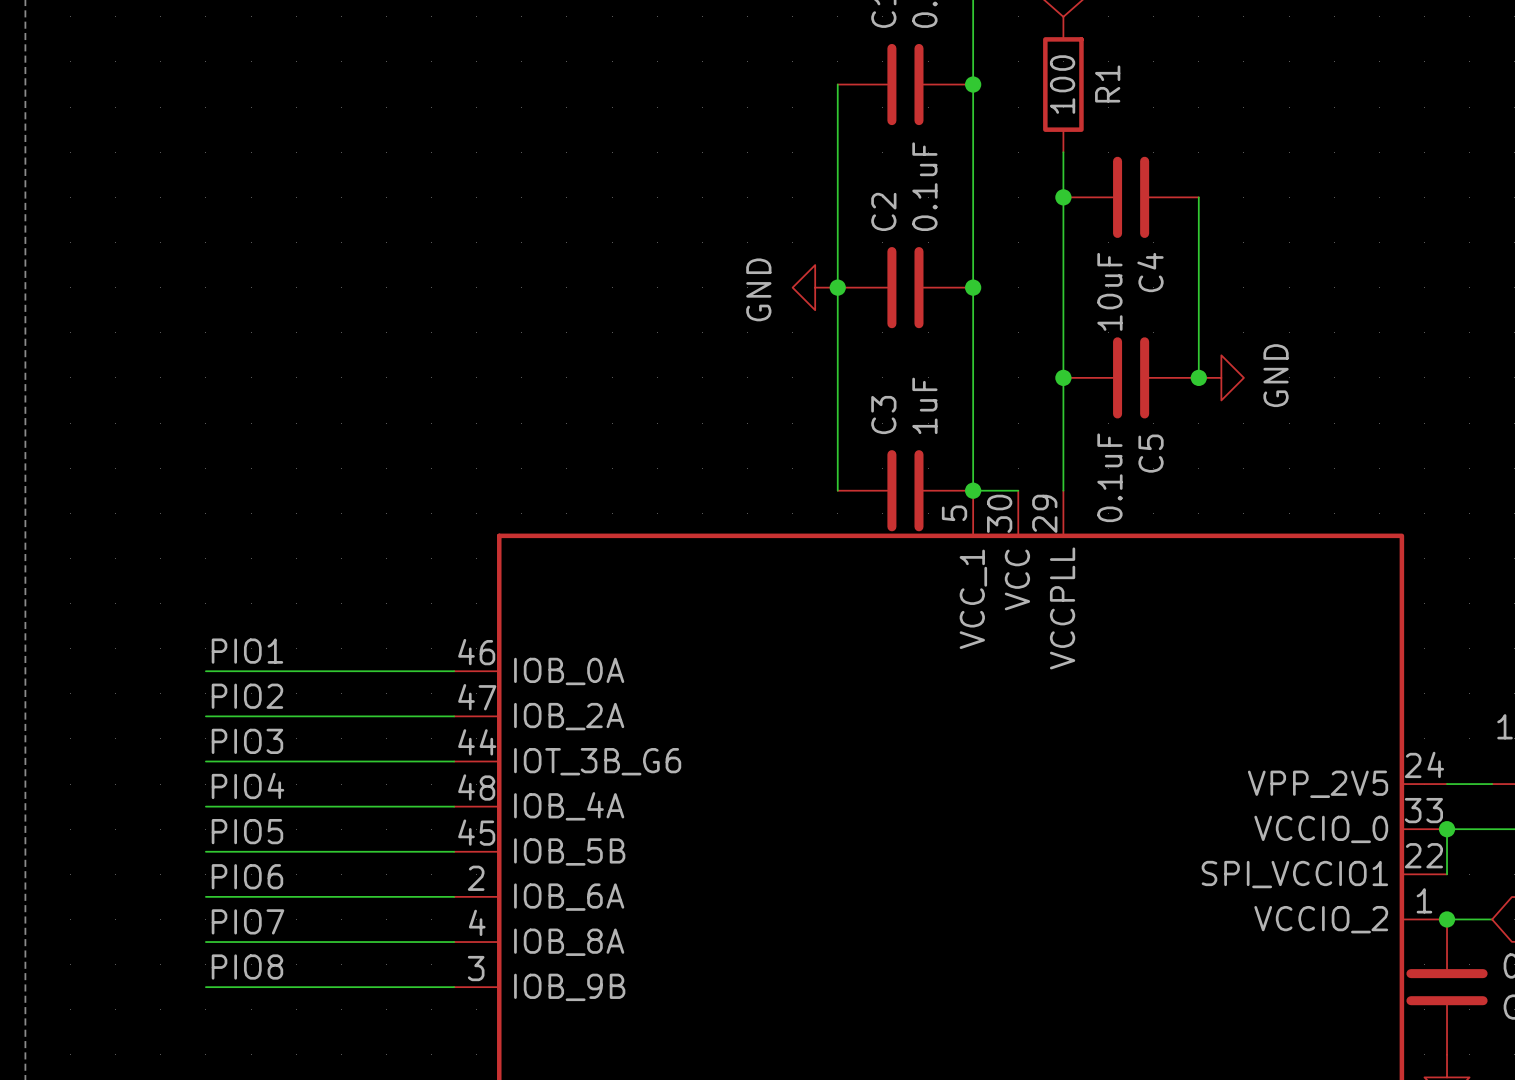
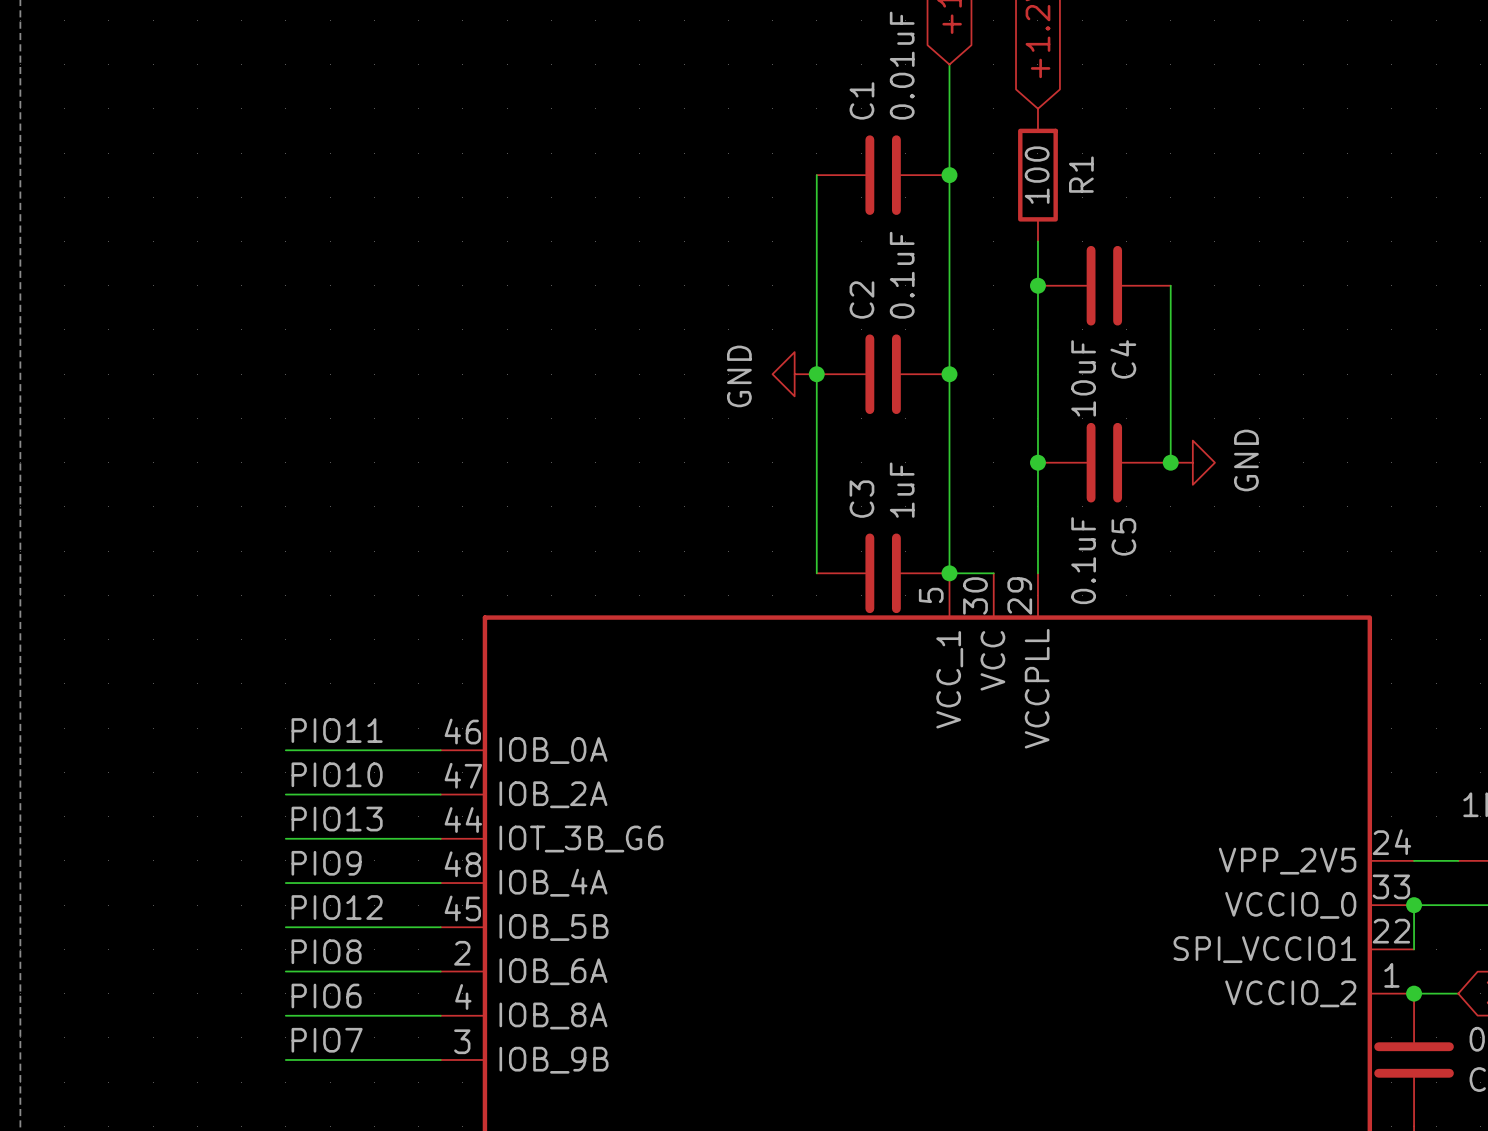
label: PIO1 (247, 651) -> none
label: none -> PIO11 (337, 730)
wire: (205, 671) (296, 671) -> none
label: PIO2 (247, 696) -> none
label: none -> PIO10 (337, 774)
wire: (205, 716) (296, 716) -> none
label: PIO3 (247, 741) -> none
label: none -> PIO13 (337, 819)
wire: (205, 761) (296, 761) -> none
label: PIO4 (247, 785) -> none
label: none -> PIO9 (326, 863)
wire: (205, 806) (296, 806) -> none
label: PIO5 (247, 831) -> none
label: none -> PIO12 (337, 907)
wire: (205, 851) (296, 851) -> none
label position: PIO6 (247, 876) -> PIO6 (326, 996)
wire: (205, 896) (296, 896) -> none
label position: PIO7 (247, 921) -> PIO7 (327, 1040)
wire: (205, 942) (296, 942) -> none
label position: PIO8 (247, 967) -> PIO8 (326, 951)
wire: (205, 987) (296, 987) -> none

